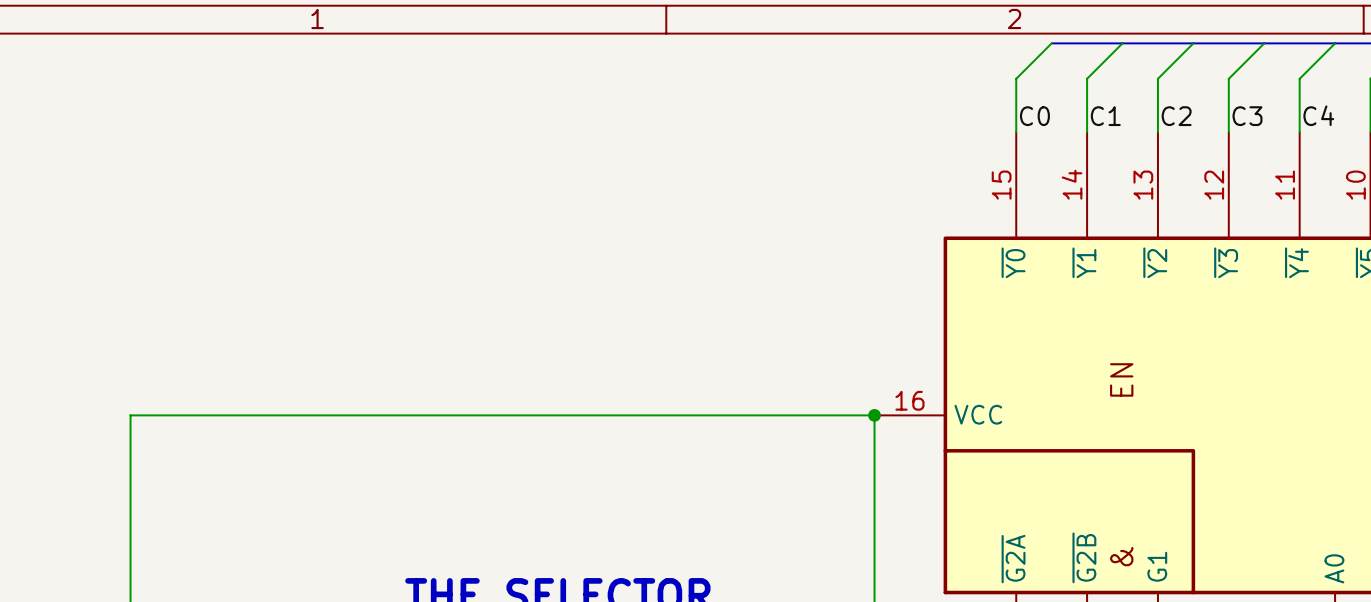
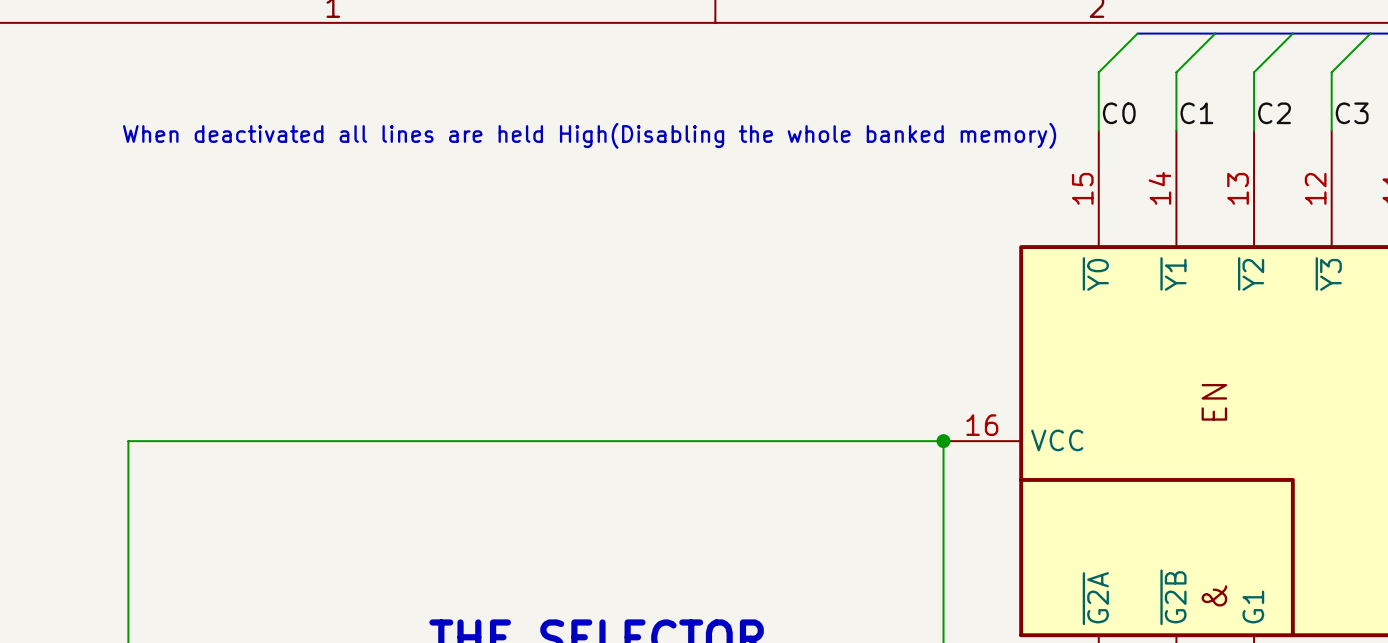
text: none -> When deactivated all lines are held High(Disabling the whole banked memory) (589, 135)

